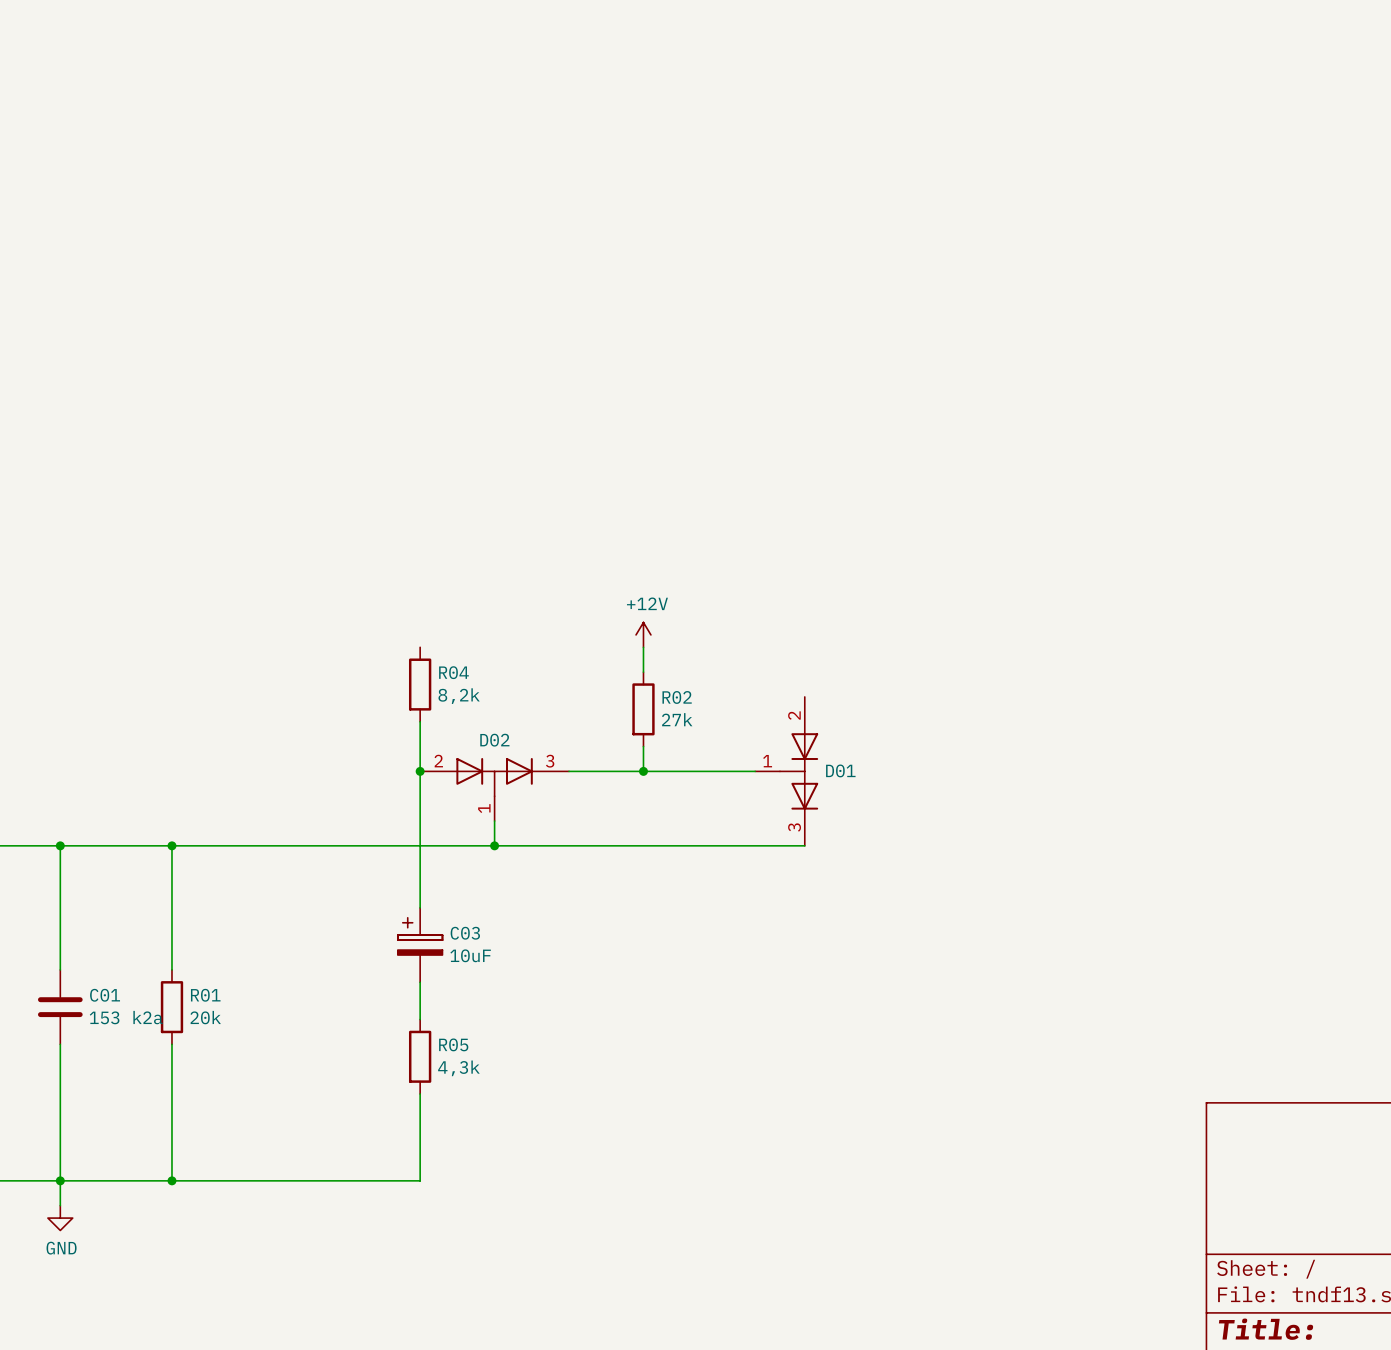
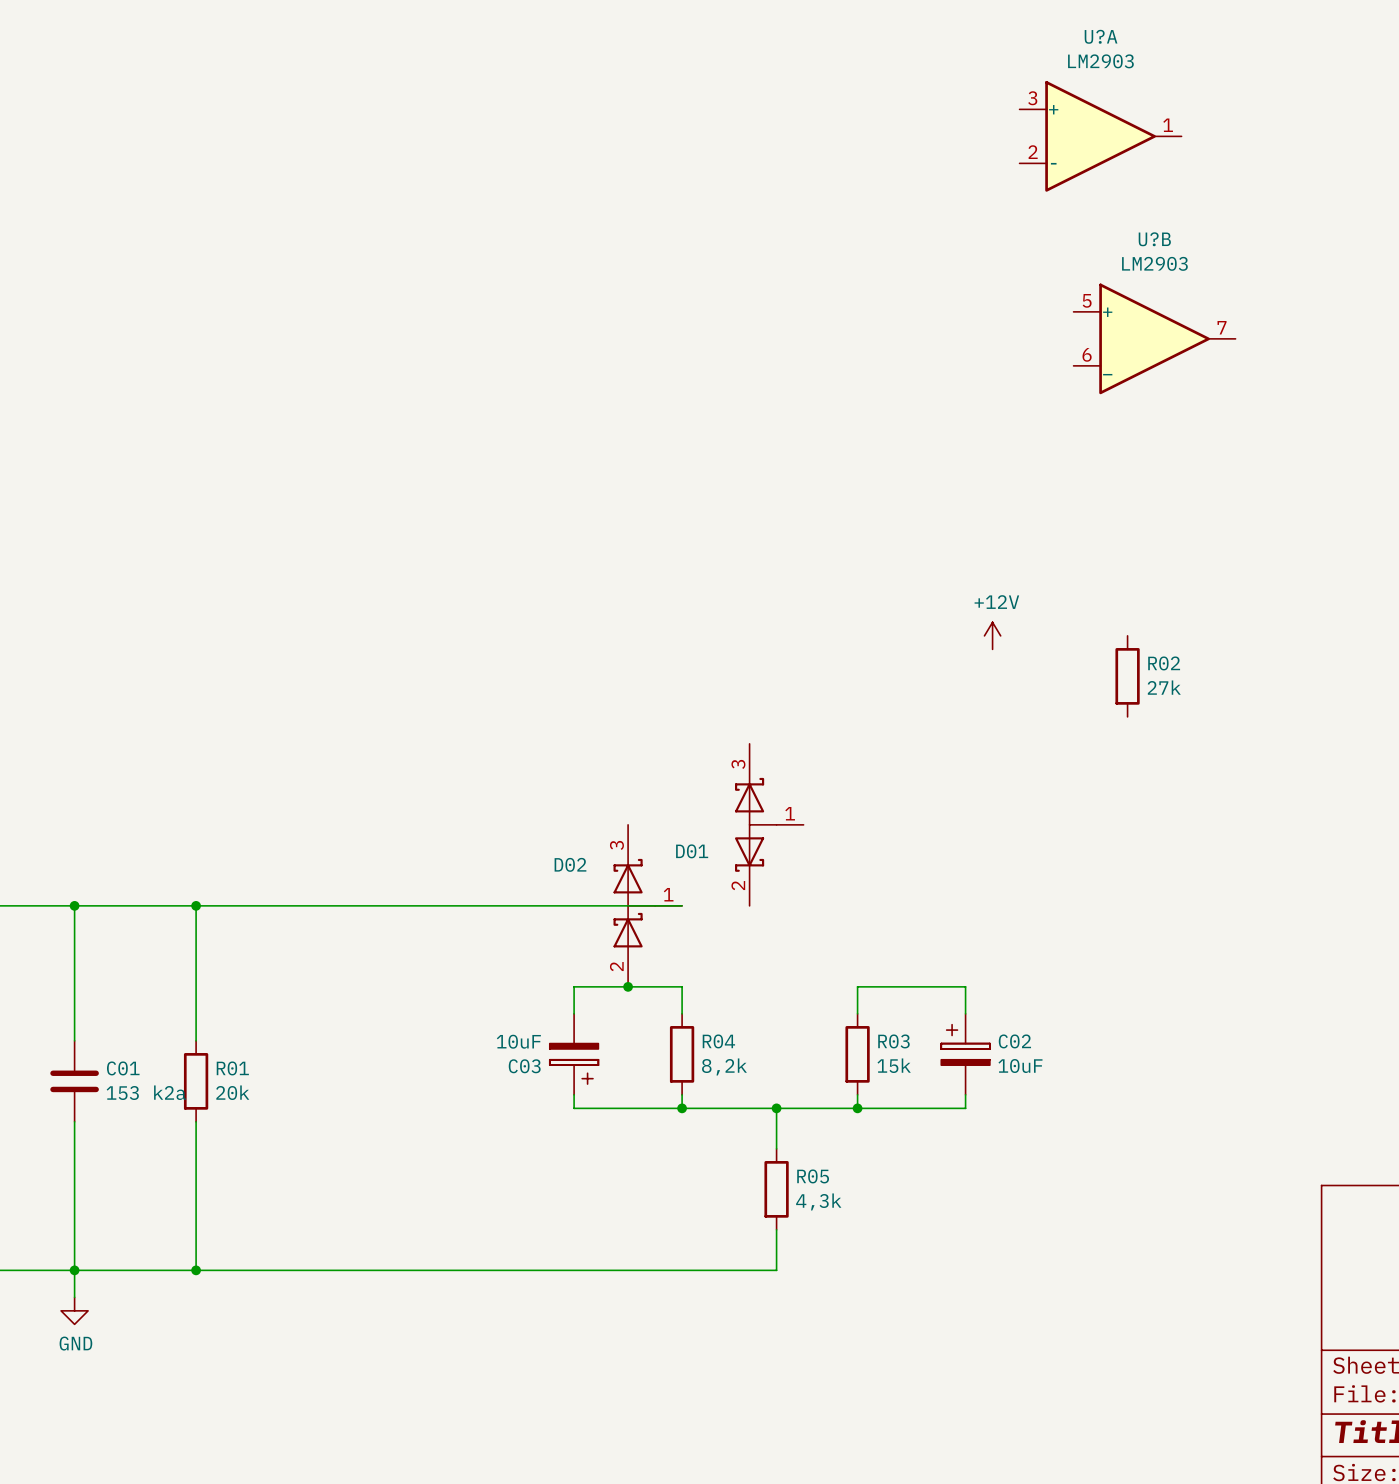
U?A: none -> LM2903 (1100, 136)
U?B: none -> LM2903 (1154, 338)
power symbol: none -> +12V (992, 635)
power symbol: +12V (643, 634) -> none
wire: (643, 647) (643, 672) -> none
R04 position: (420, 684) -> (682, 1054)
D01 symbol: [755, 696, 819, 846] -> [734, 743, 804, 906]
R02 position: (643, 709) -> (1127, 676)
wire: (420, 721) (420, 907) -> none
D02 name position: D02 (494, 740) -> D02 (570, 864)
wire: (643, 746) (643, 771) -> none
D02 symbol: [420, 758, 570, 822] -> [613, 824, 683, 987]
D01 name position: D01 (840, 770) -> D01 (692, 851)
junction: (420, 771) -> none
wire: (569, 771) (755, 771) -> none
junction: (643, 771) -> none
wire: (494, 821) (494, 845) -> none
junction: (494, 845) -> none
wire: (618, 845) (804, 845) -> none
junction: none -> (628, 986)
C03 rotation: 0° (420, 936) -> 180° (574, 1063)
C03 position: (420, 945) -> (574, 1054)
wire: none -> (574, 1013) (574, 986) (682, 986) (682, 1013)
wire: none -> (857, 1013) (857, 986) (965, 986) (965, 1013)
wire: (420, 982) (420, 1019) -> none
R03: none -> 15k (857, 1054)
C02: none -> 10uF (965, 1054)
wire: none -> (574, 1094) (574, 1108) (965, 1108) (965, 1094)
wire: none -> (682, 1094) (682, 1108)
wire: none -> (857, 1094) (857, 1108)
junction: none -> (682, 1108)
wire: none -> (776, 1108) (776, 1148)
junction: none -> (776, 1108)
junction: none -> (857, 1108)
R05 position: (420, 1056) -> (776, 1189)
wire: (420, 1094) (420, 1180) -> (776, 1229) (776, 1270) (466, 1270)

